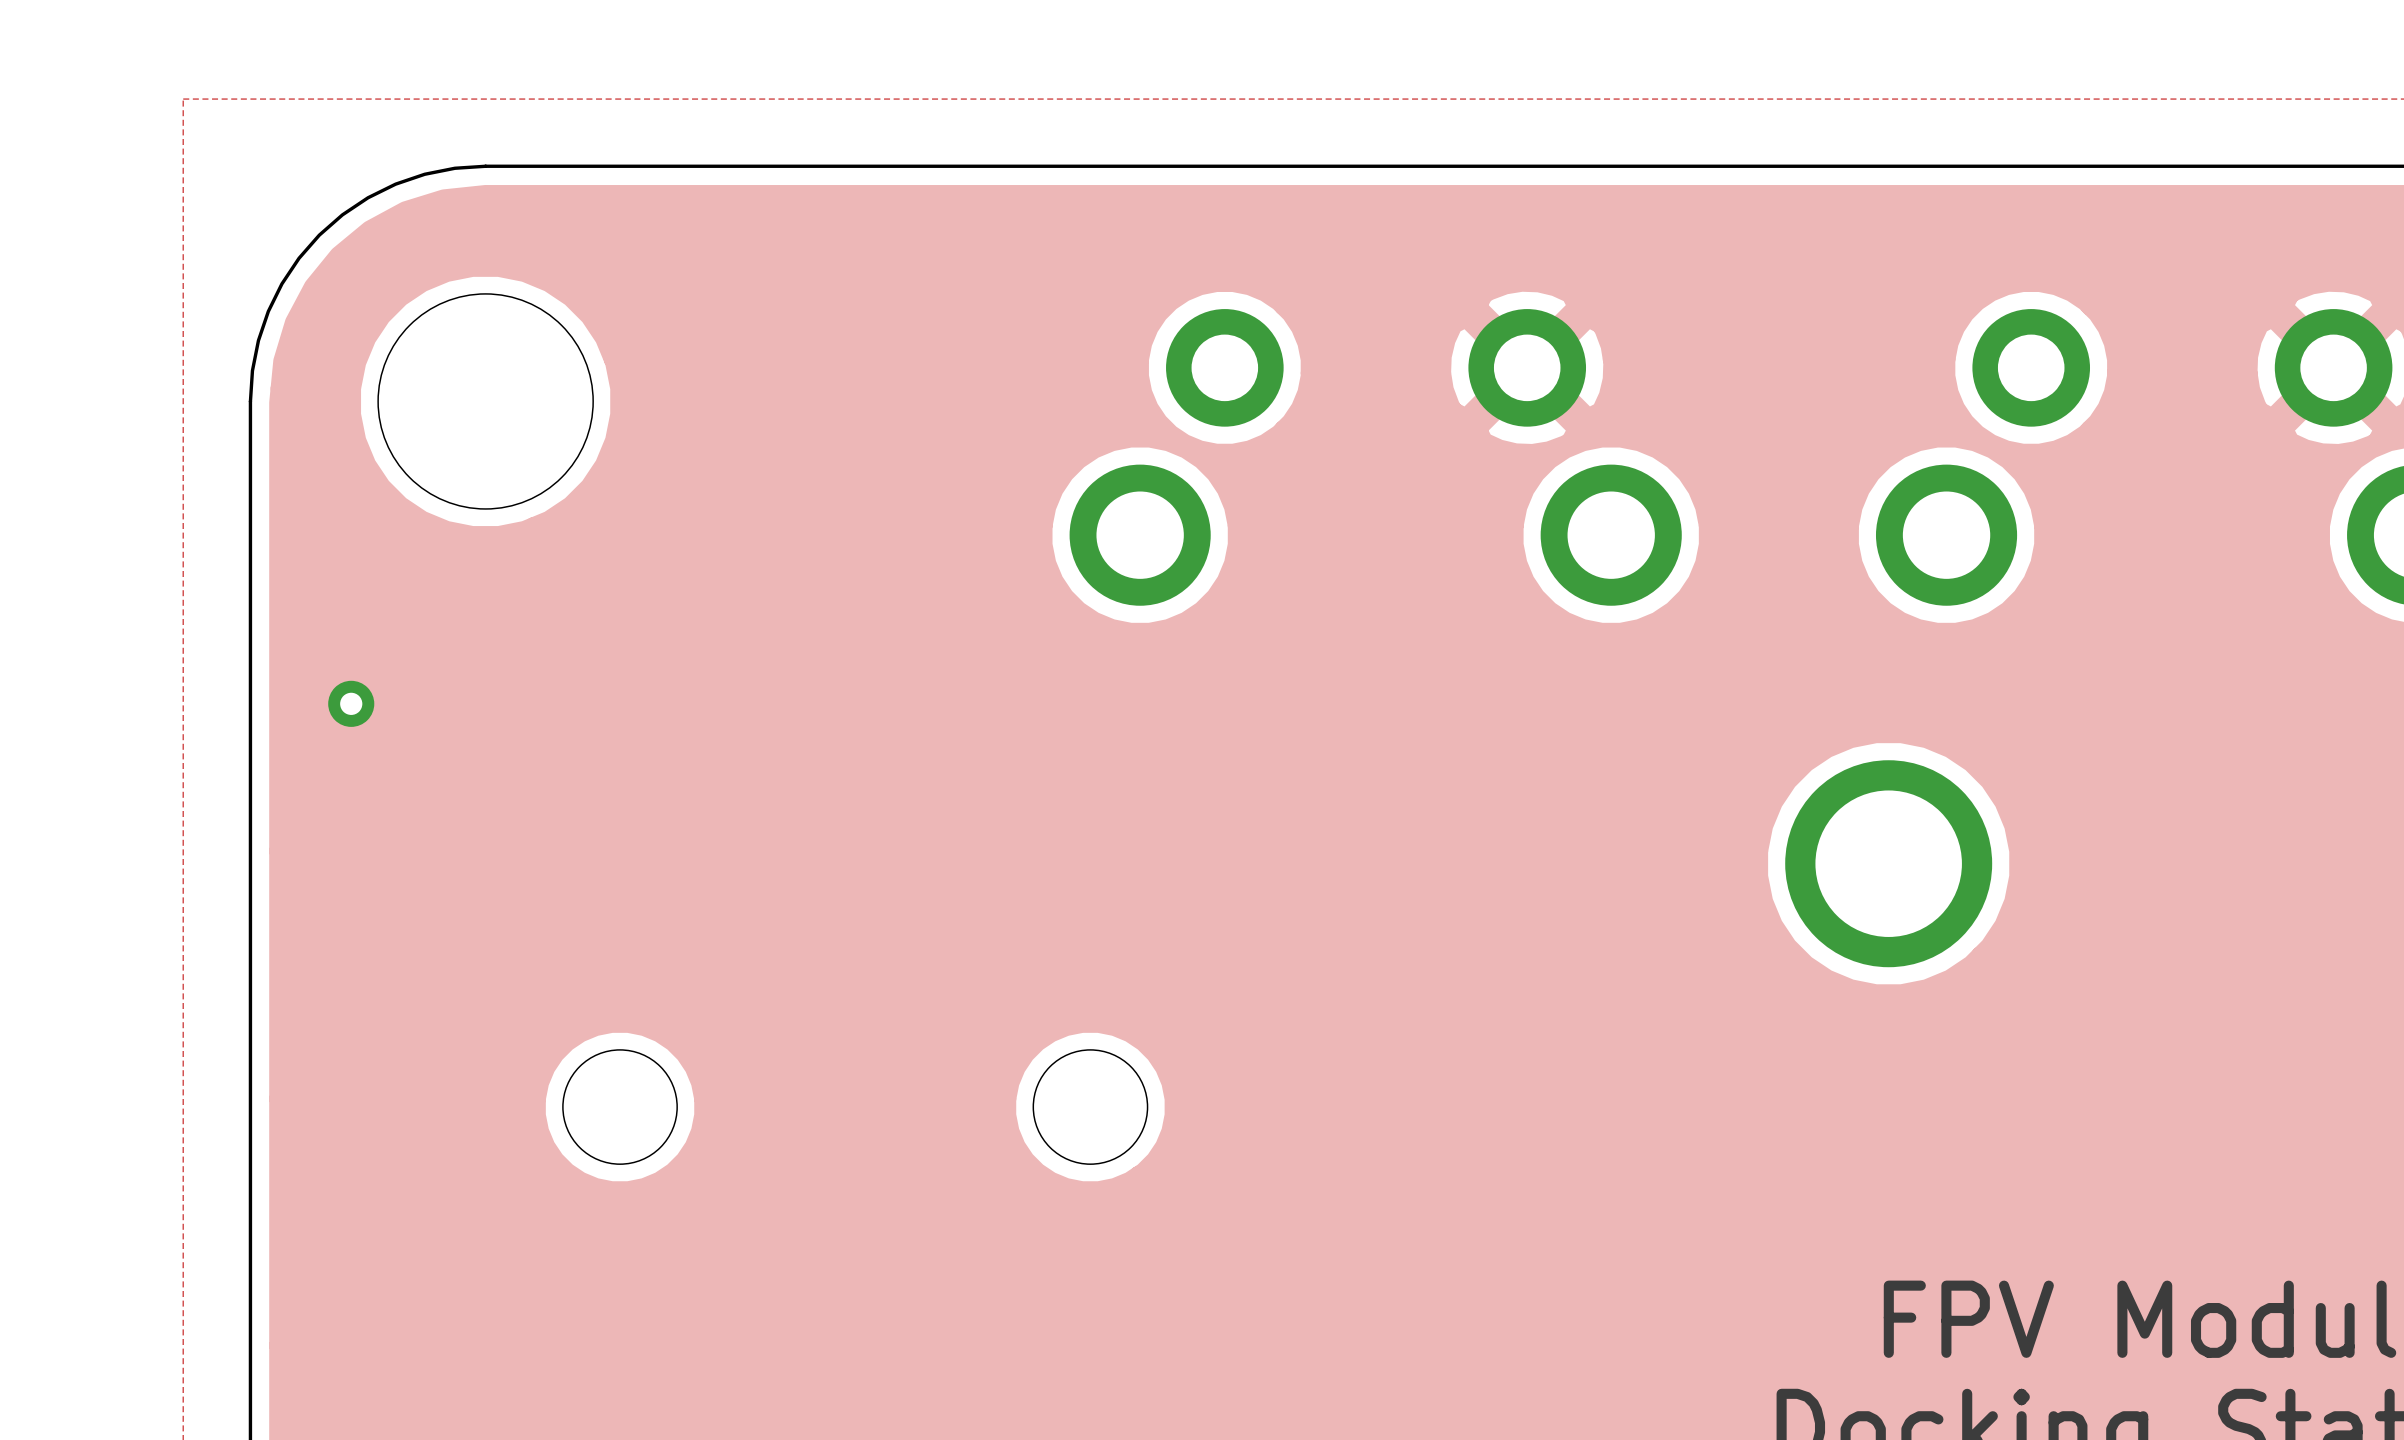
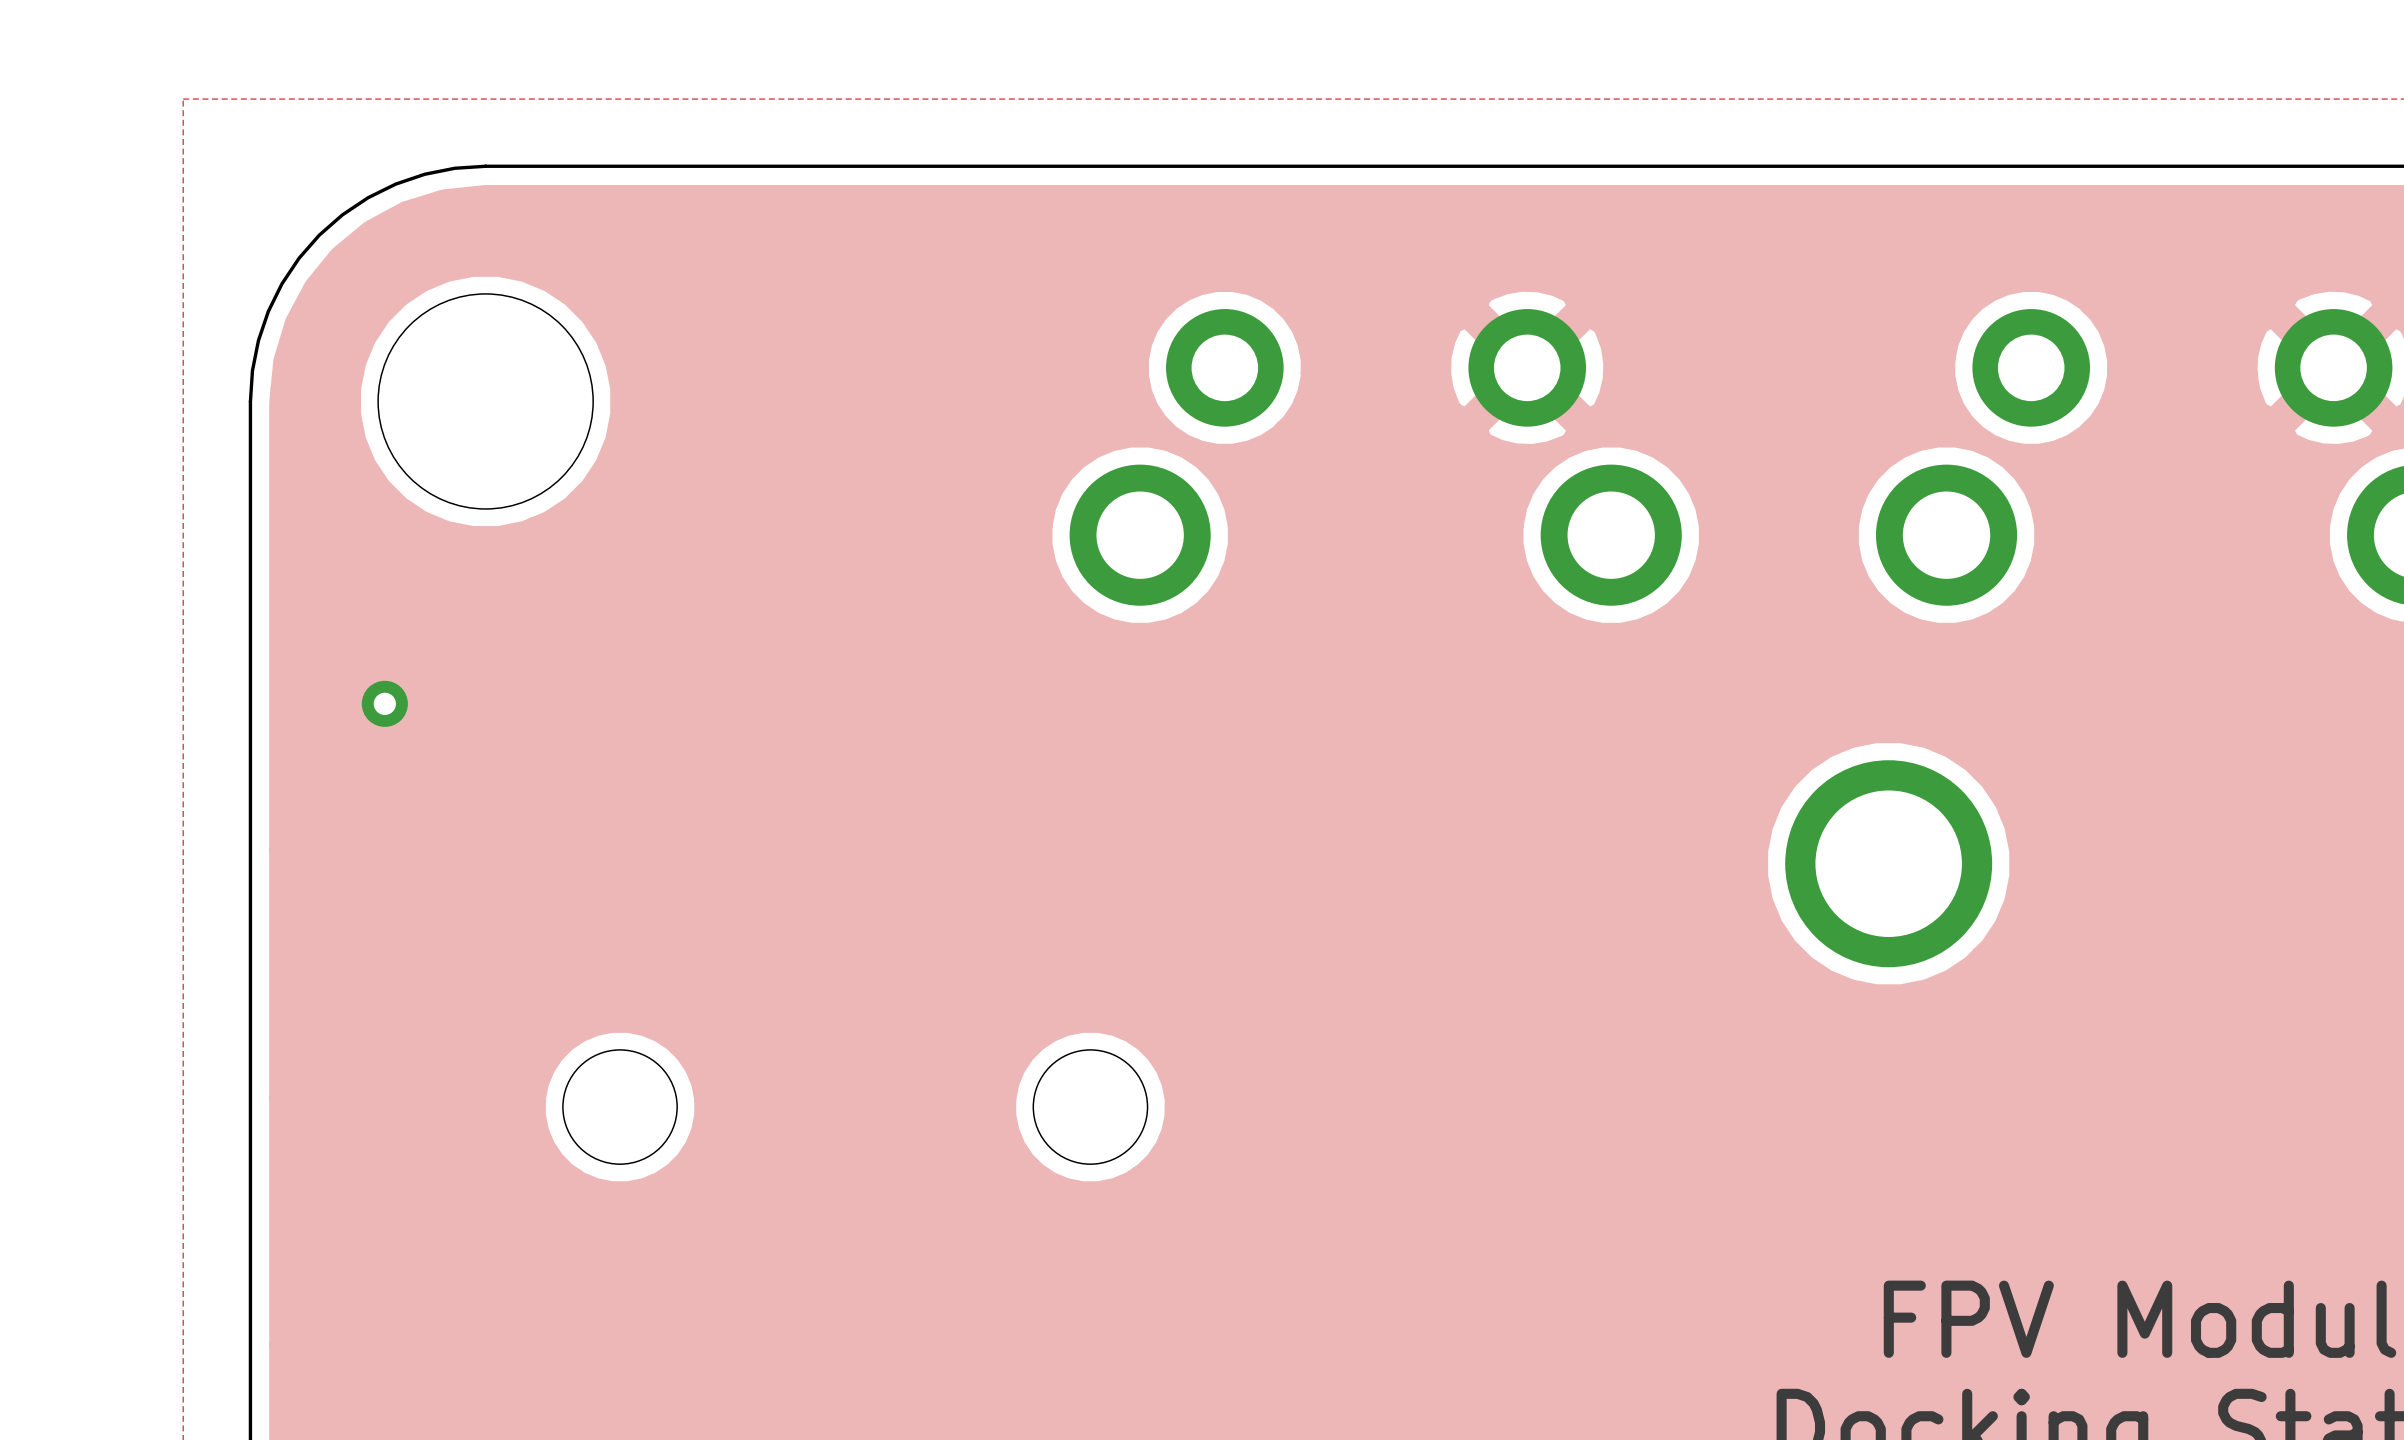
via position: (351, 703) -> (384, 703)

